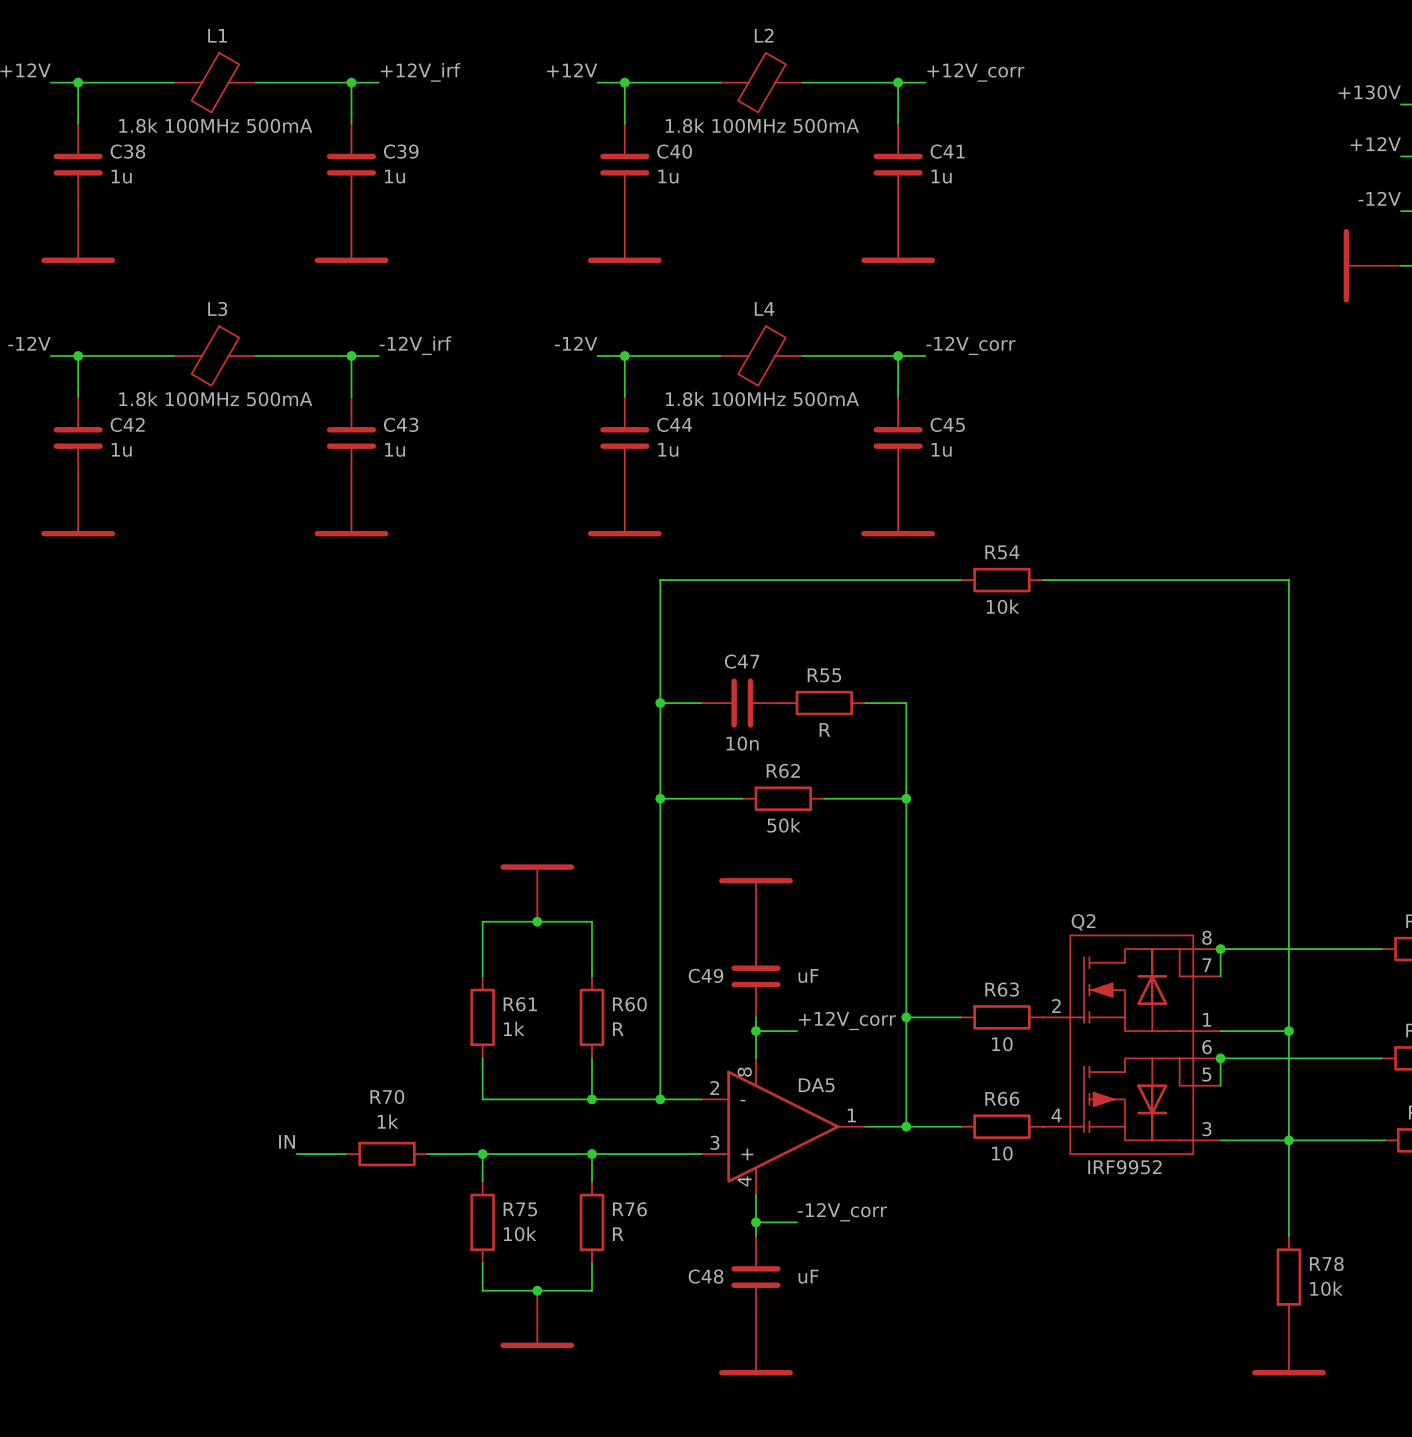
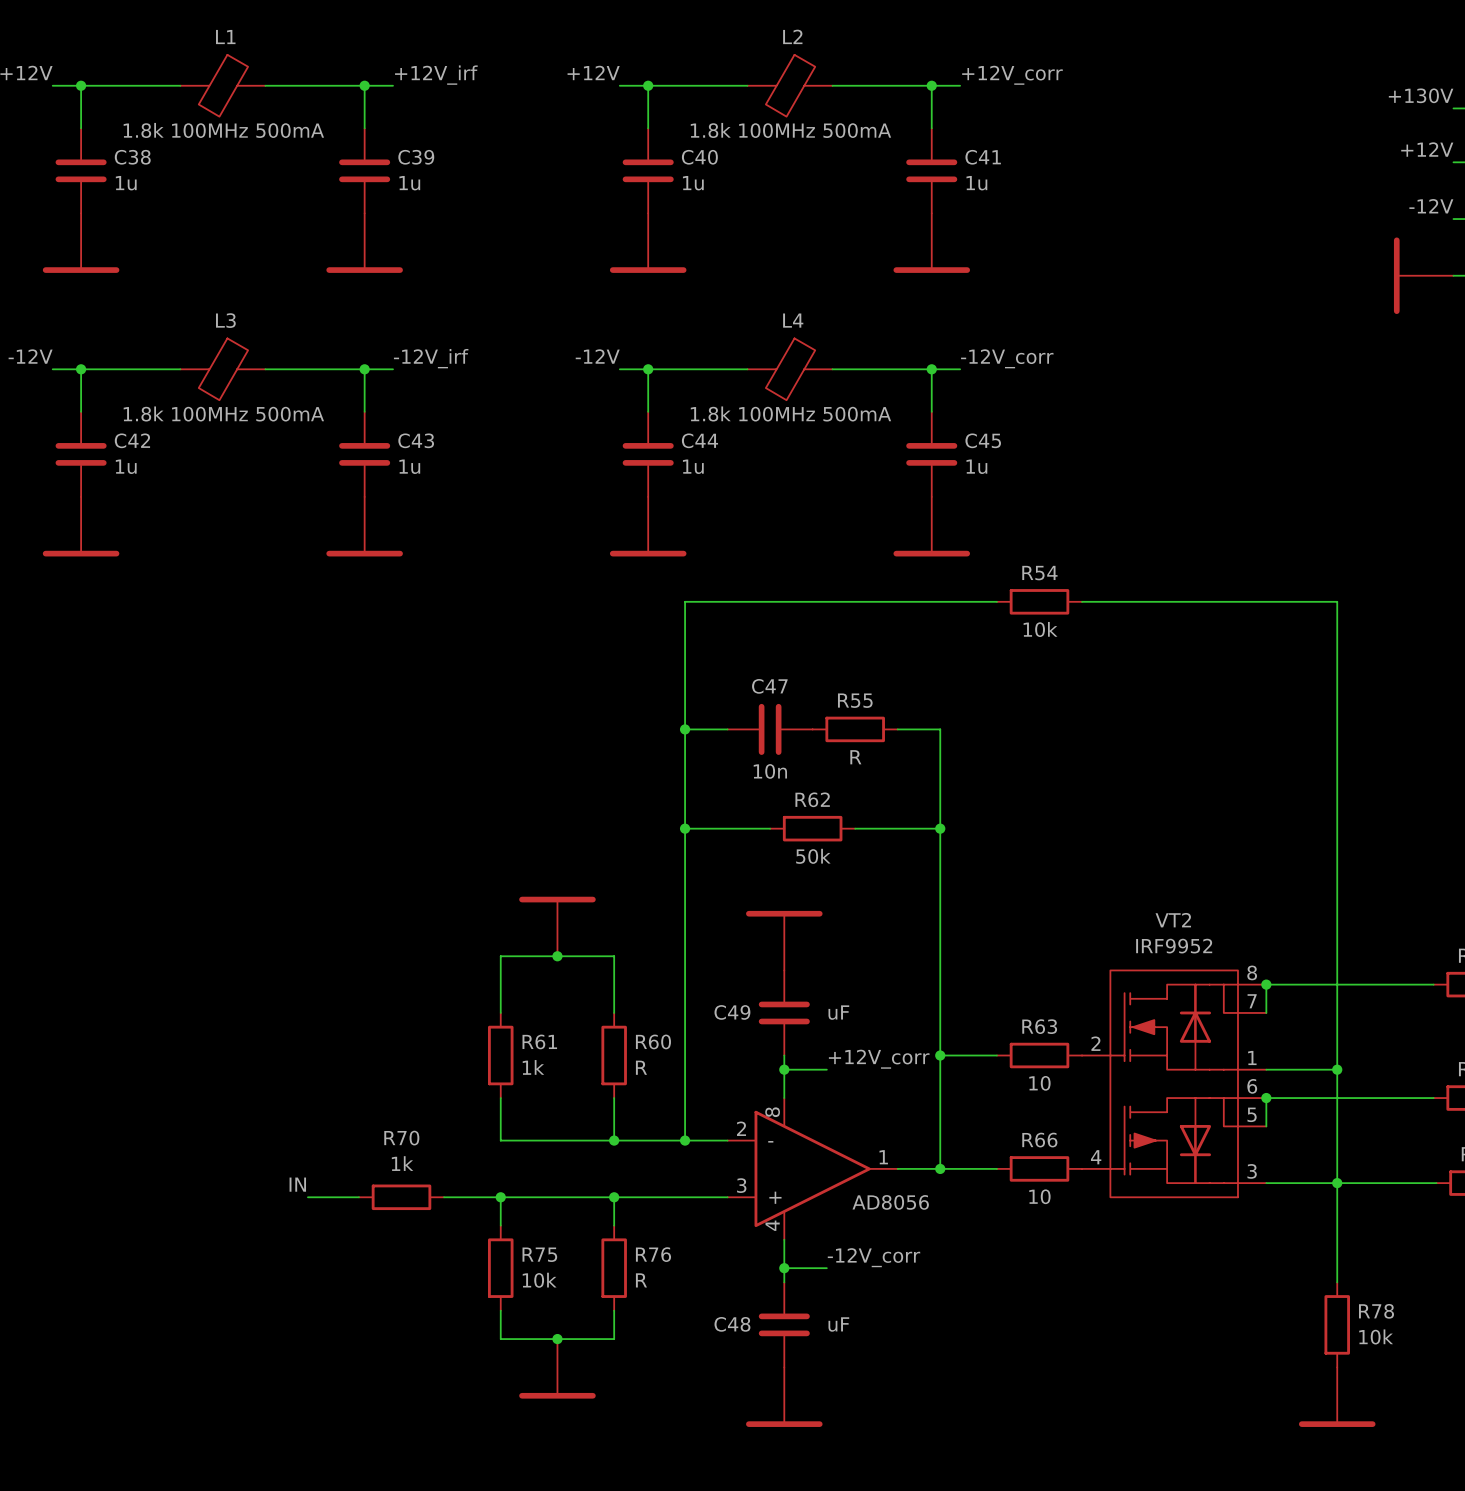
Q2 name: Q2 (1083, 922) -> VT2 (1173, 920)
DA5 name: DA5 (816, 1085) -> none
DA5 value: none -> AD8056 (890, 1202)
Q2 value position: IRF9952 (1124, 1167) -> IRF9952 (1174, 946)

